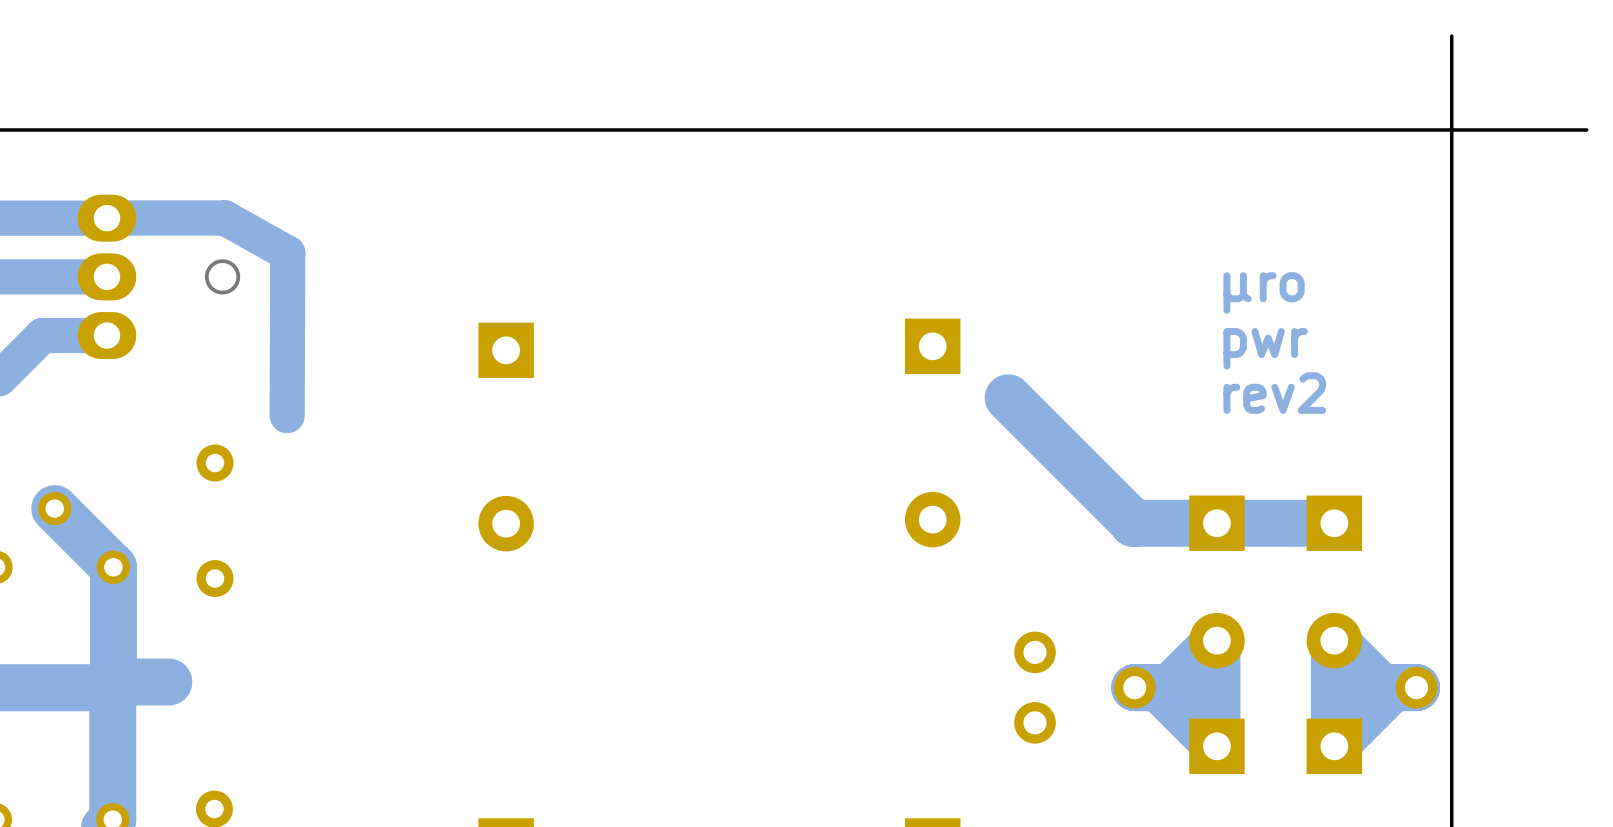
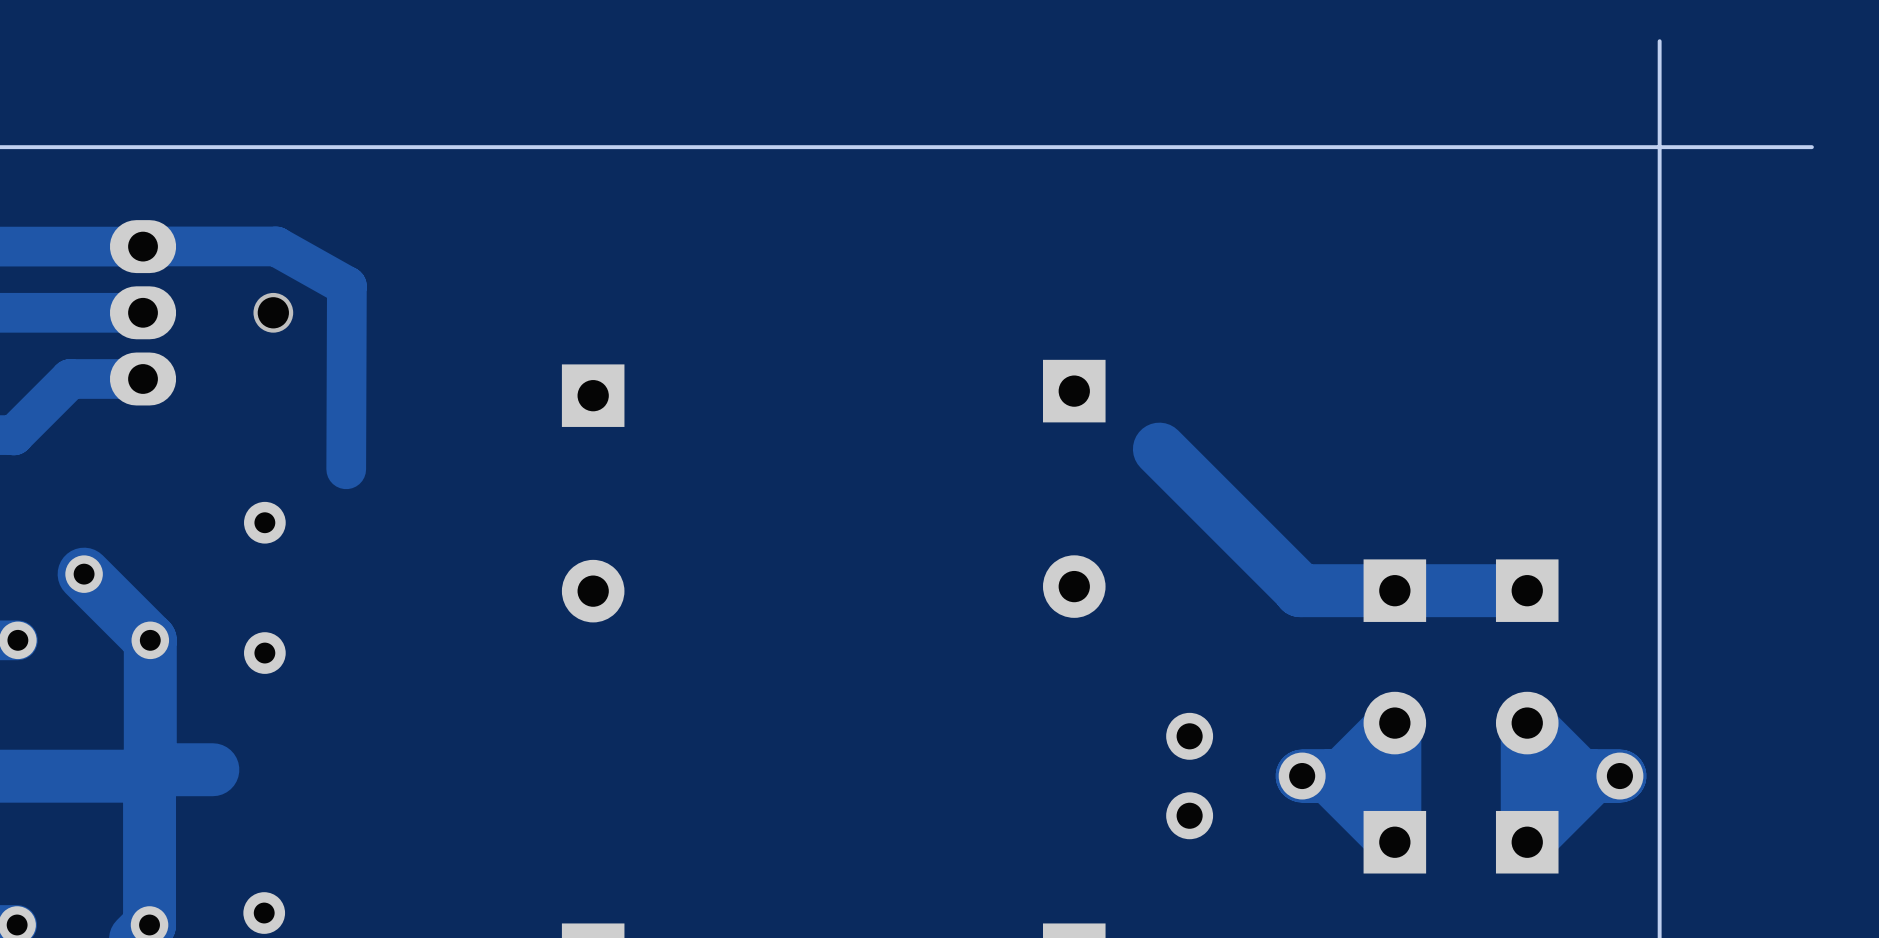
text: µro (1264, 293) -> none
text: pwr (1265, 348) -> none
text: rev2 (1274, 393) -> none

